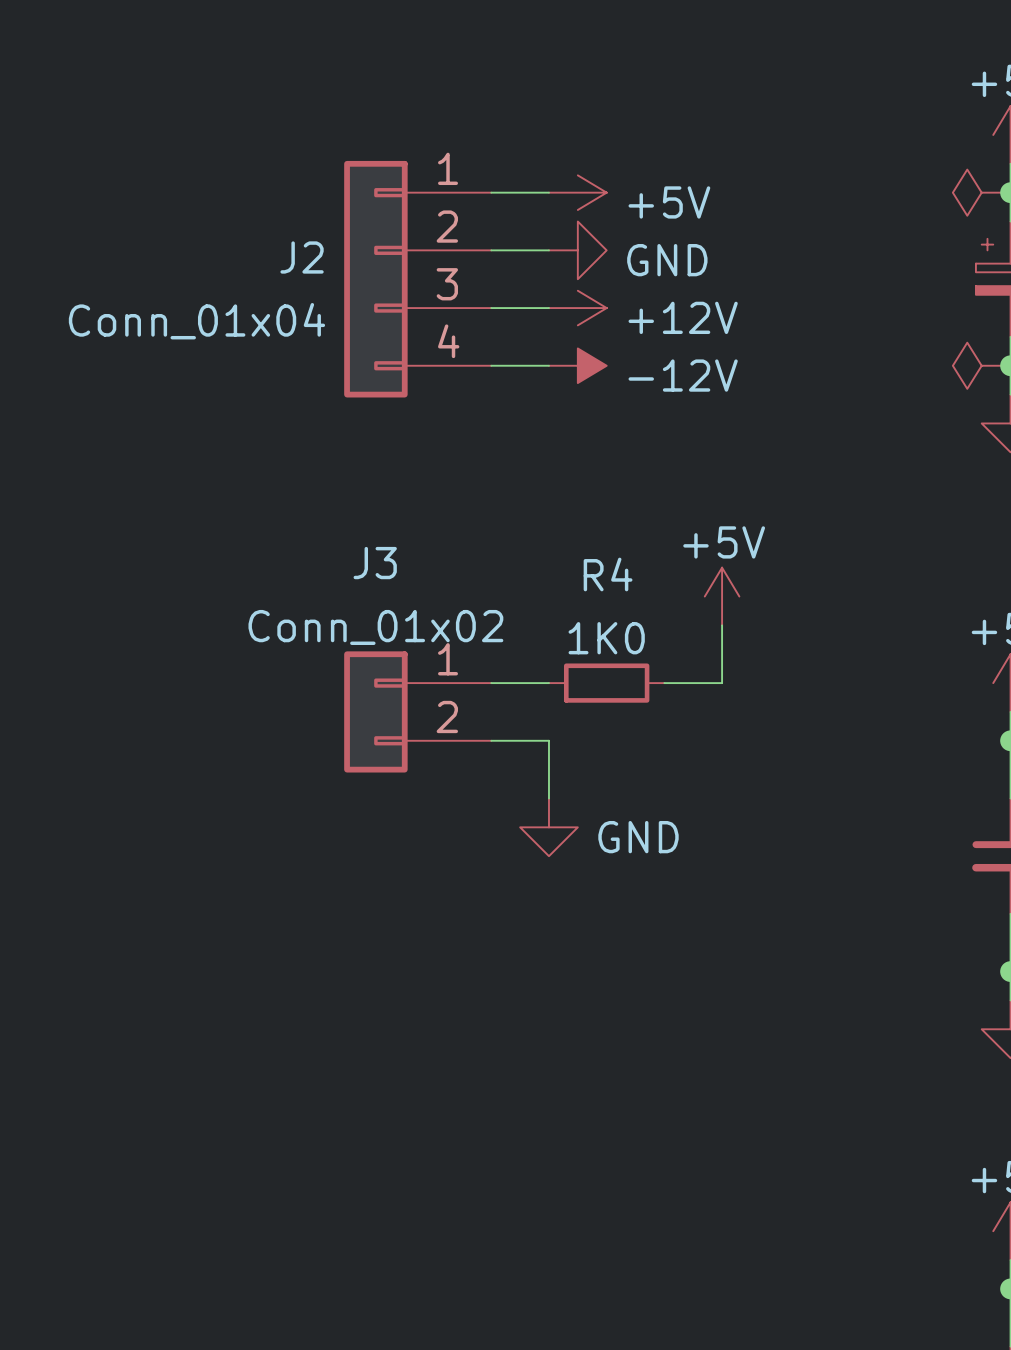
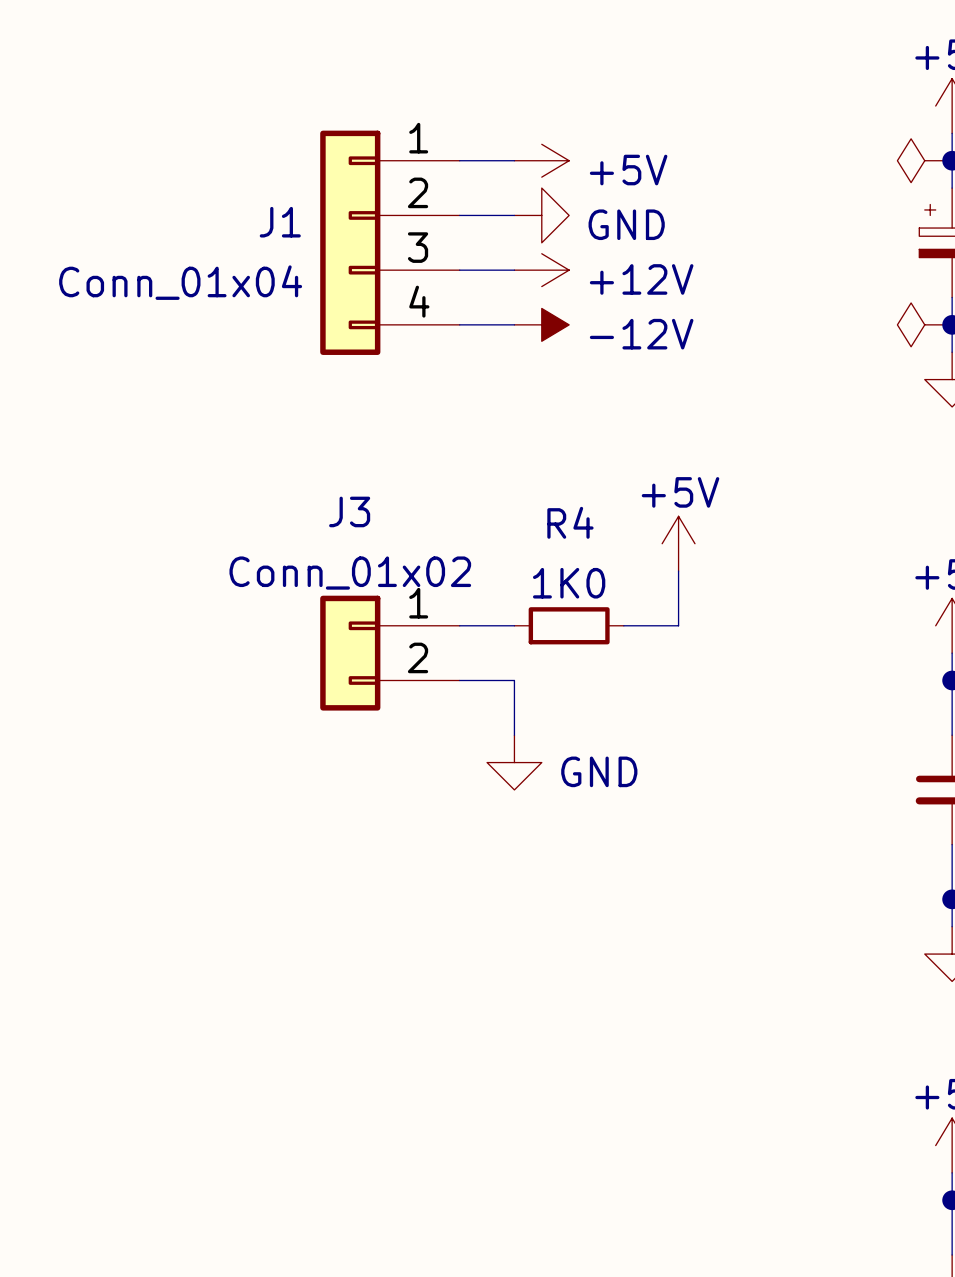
J2 name: J2 (302, 257) -> J1 (280, 222)

